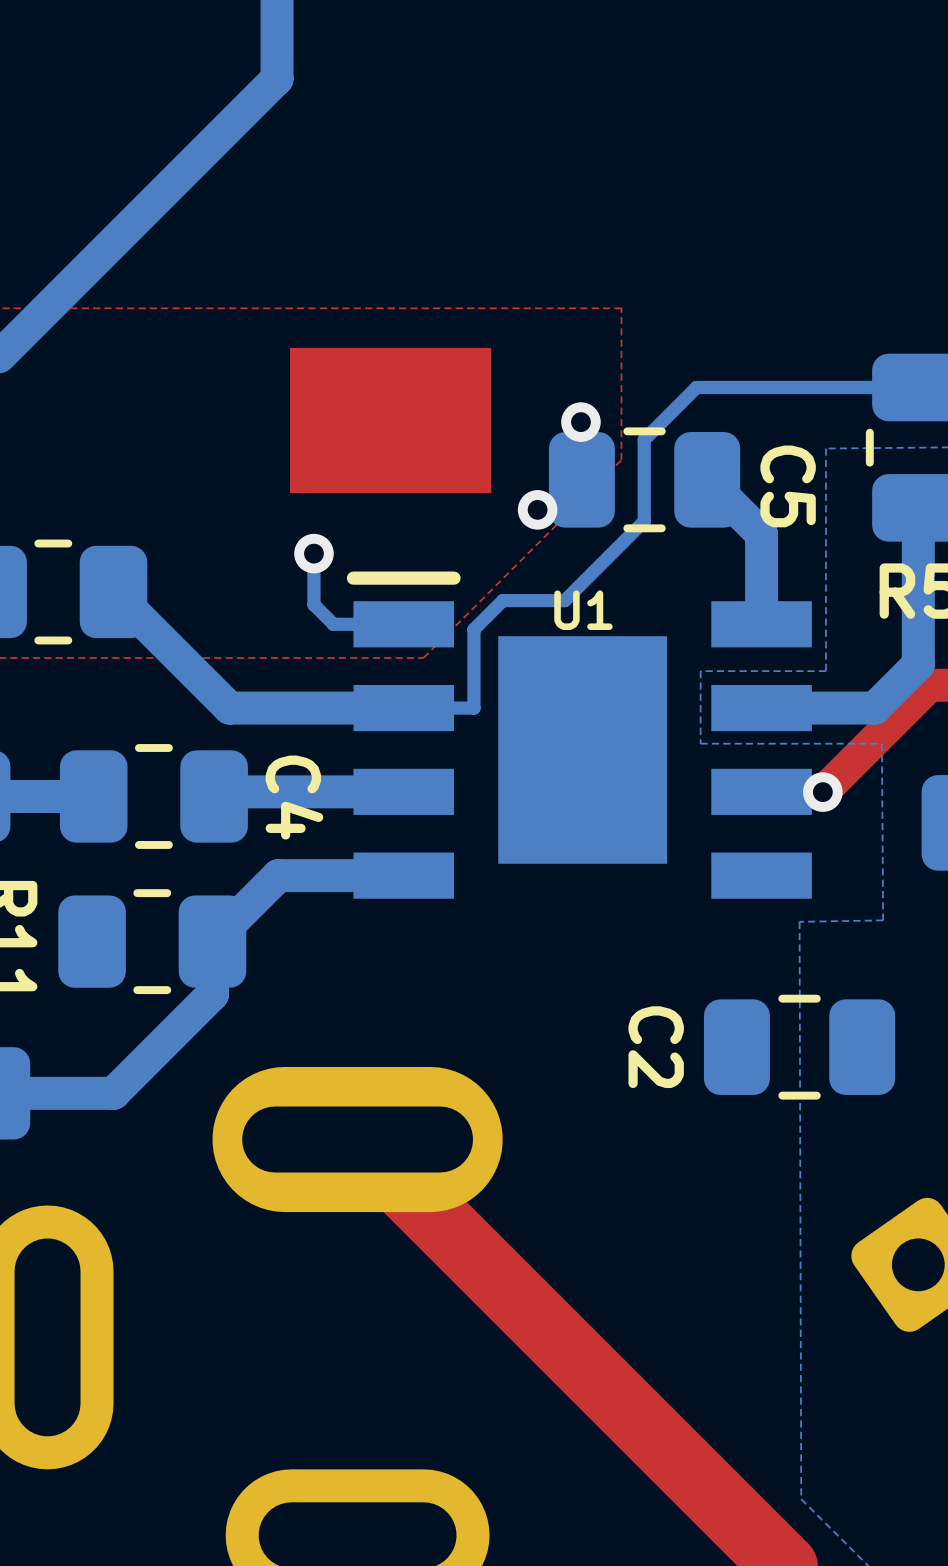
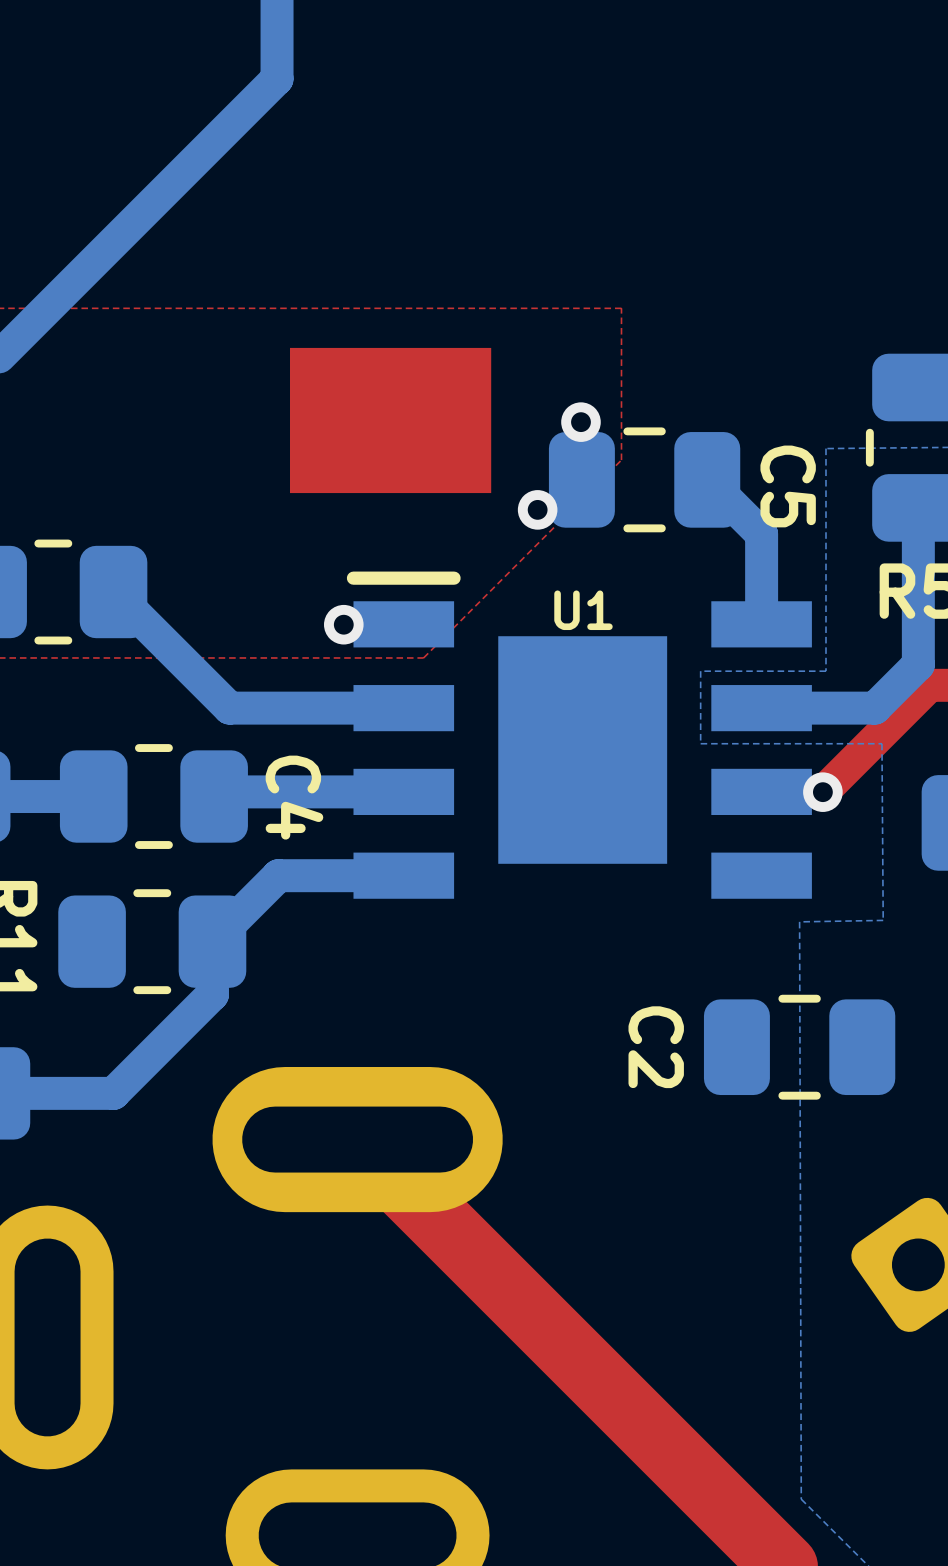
bottom track: (918, 387) (696, 387) (644, 439) (644, 521) (564, 600) (502, 600) (473, 629) (473, 708) (403, 708) -> none
bottom track: (313, 553) (313, 604) (333, 624) (403, 624) -> none
via position: (313, 553) -> (343, 624)

